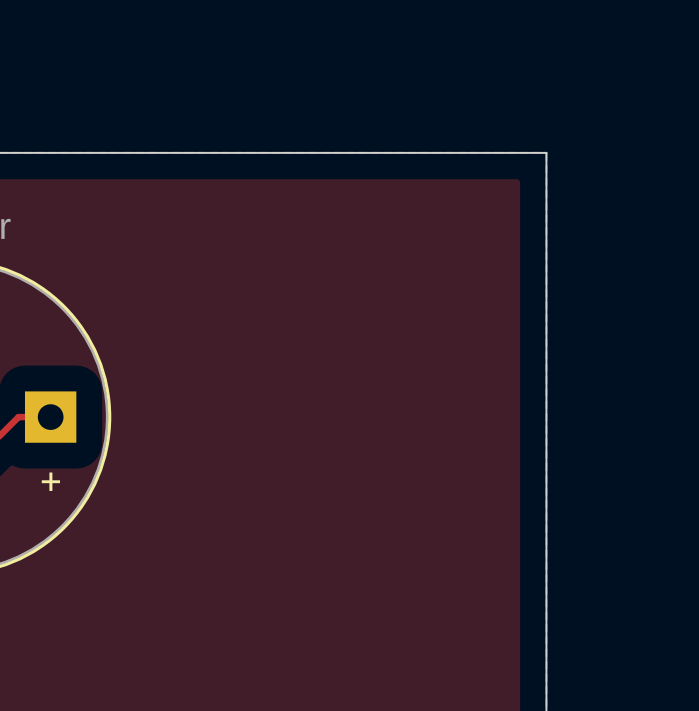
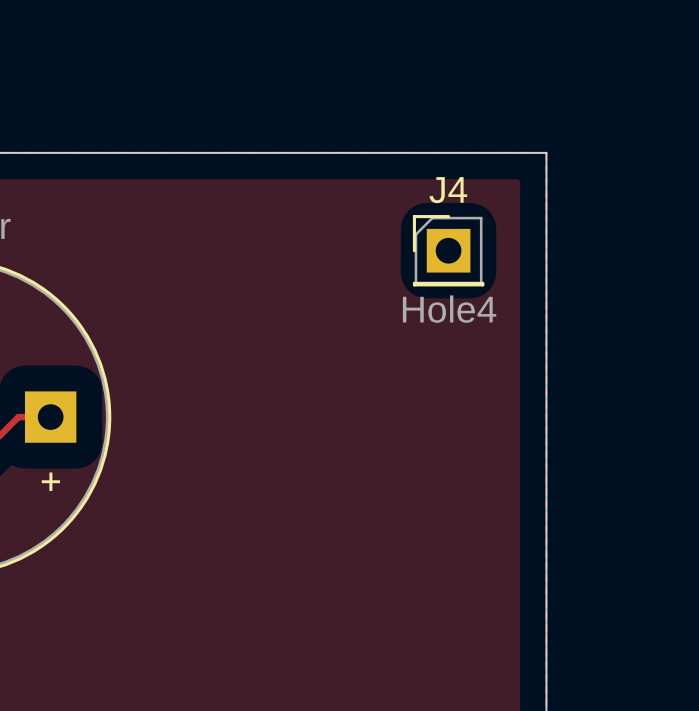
J4: none -> Hole4 (448, 250)

